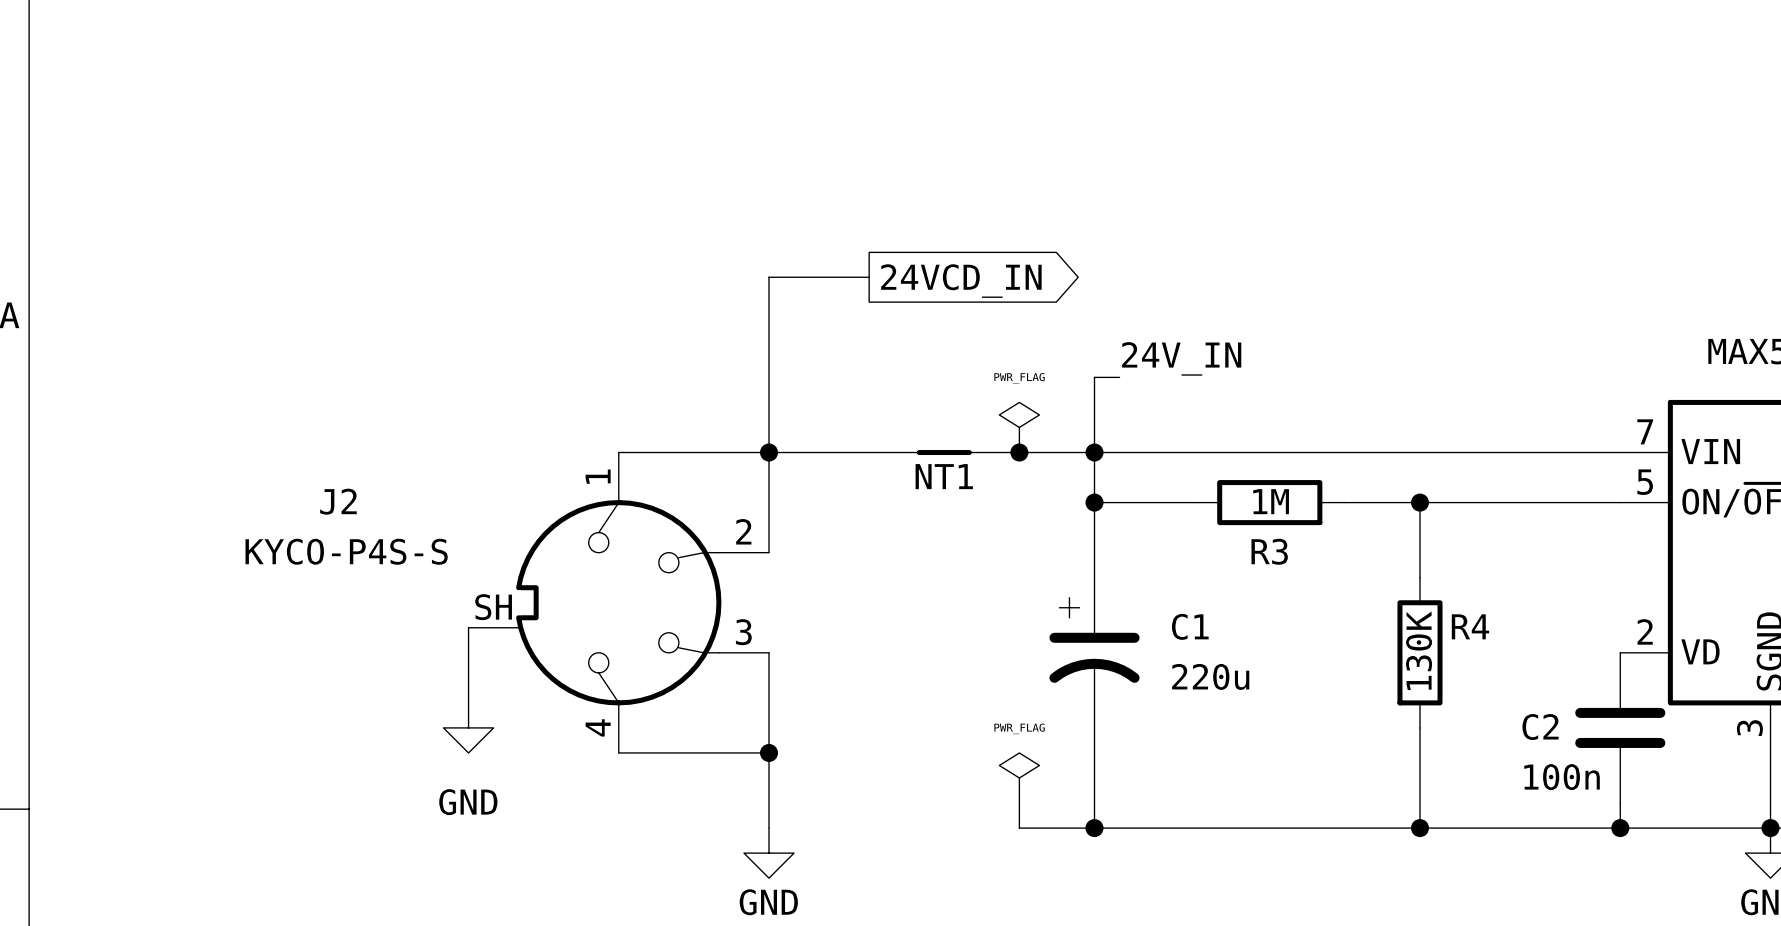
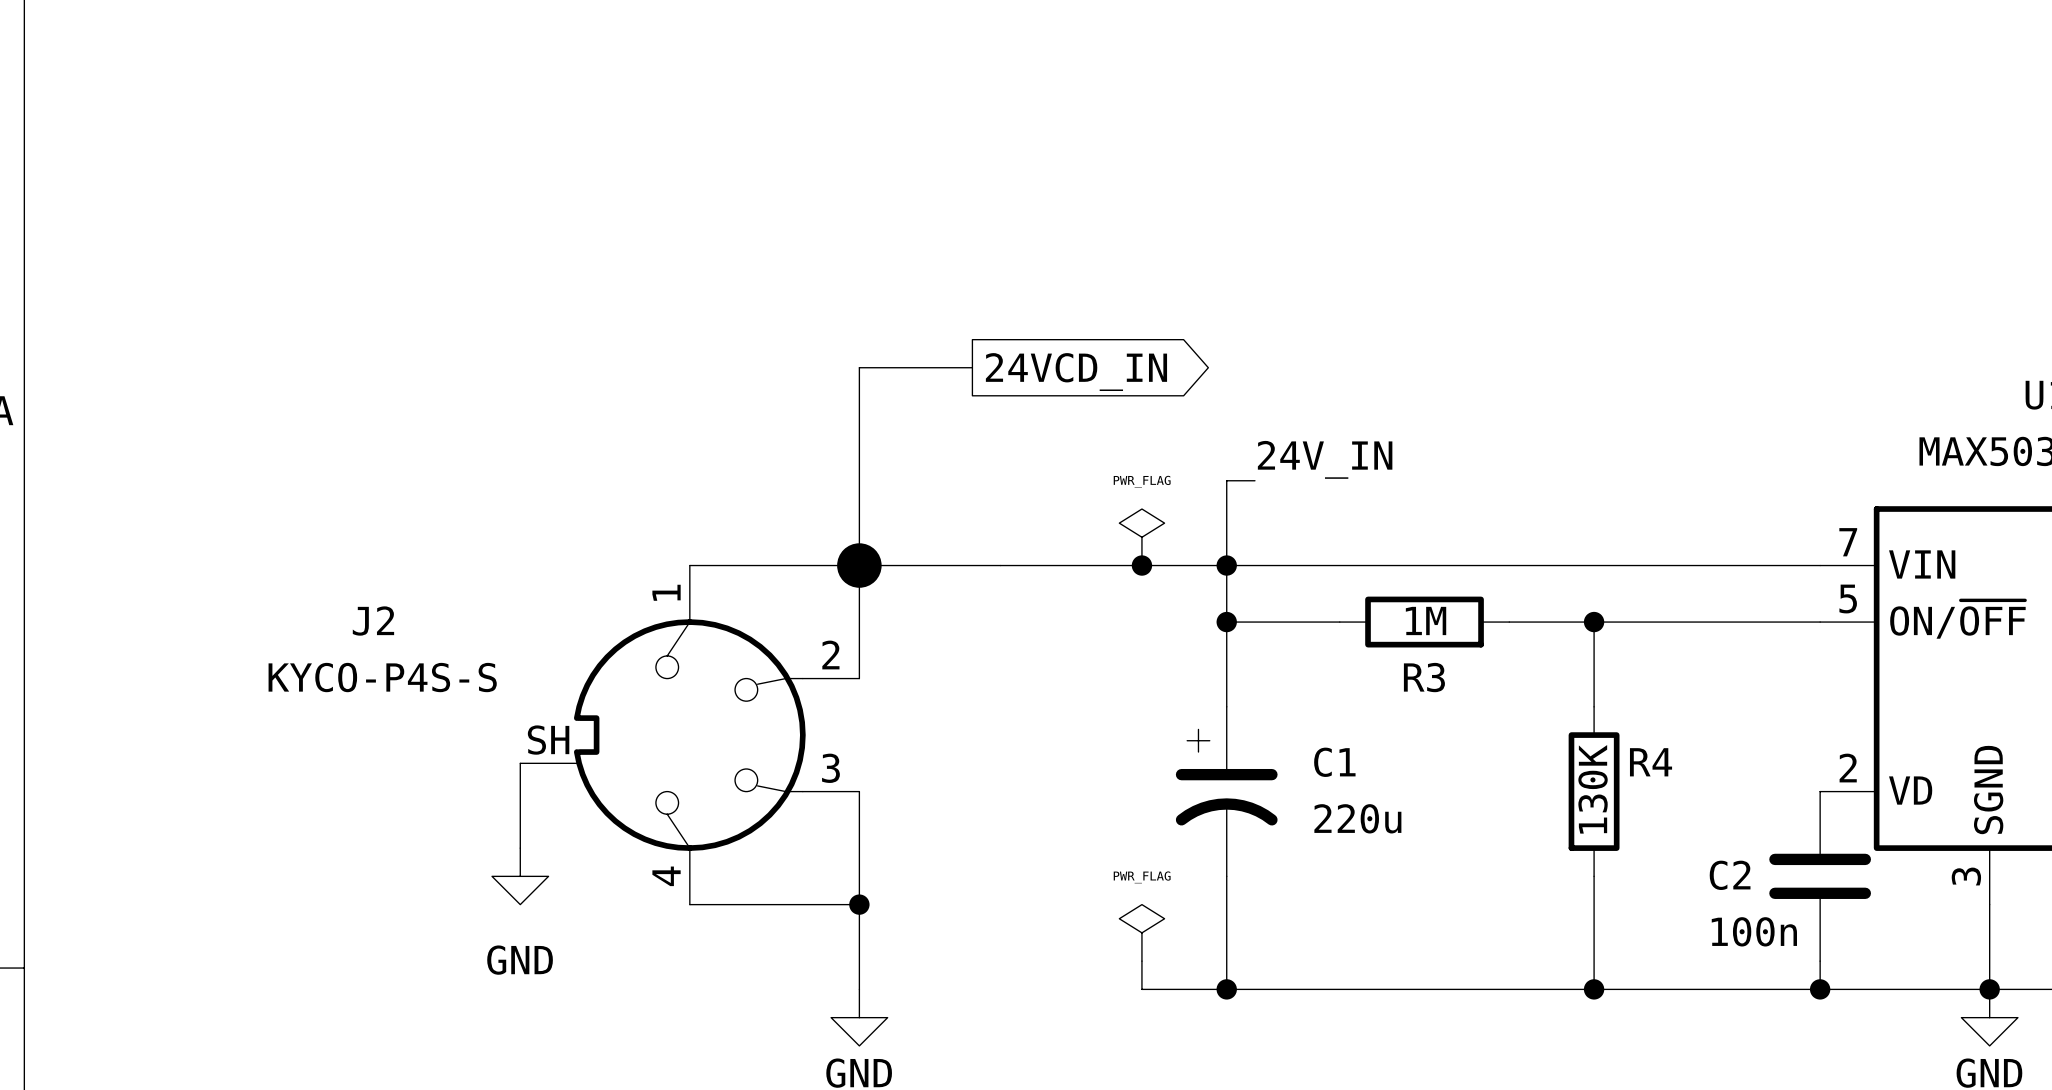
junction size: [759, 443, 779, 462] -> [837, 543, 882, 588]
NT1: (944, 452) -> none

